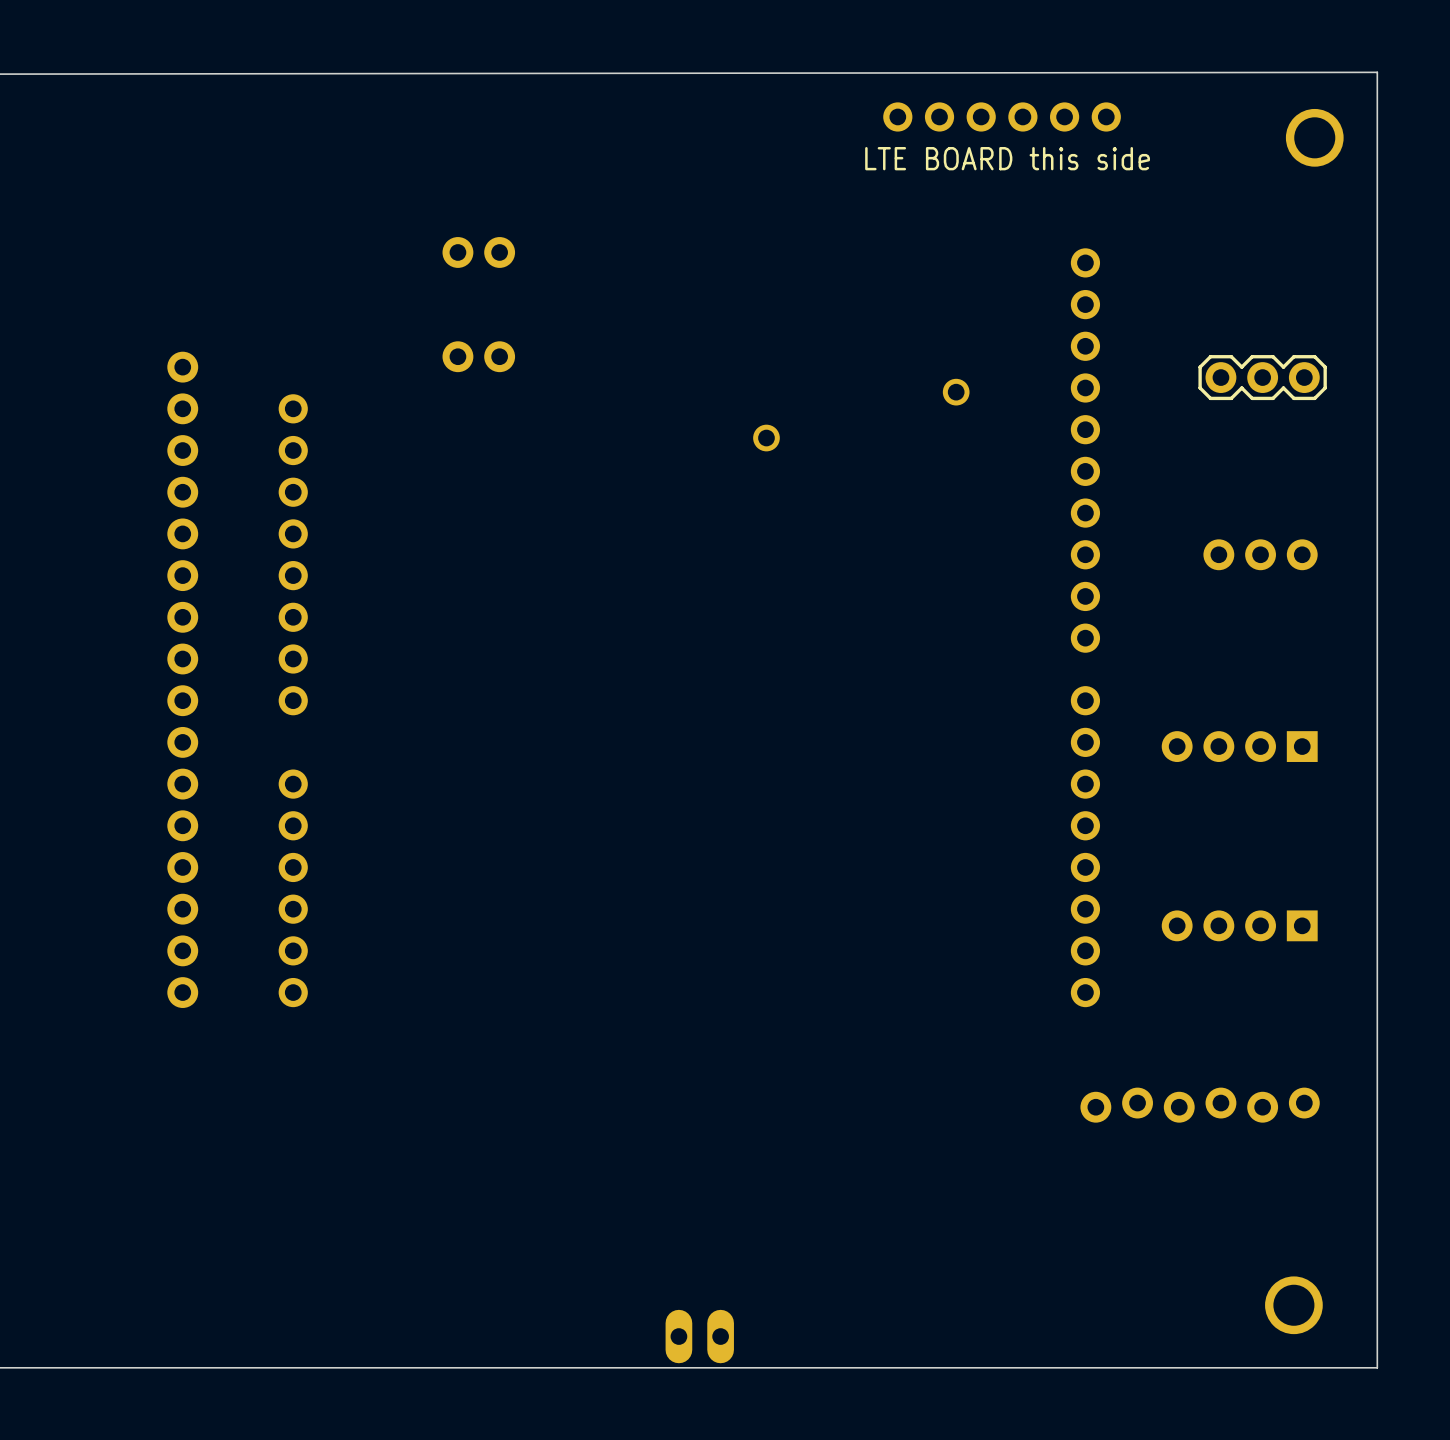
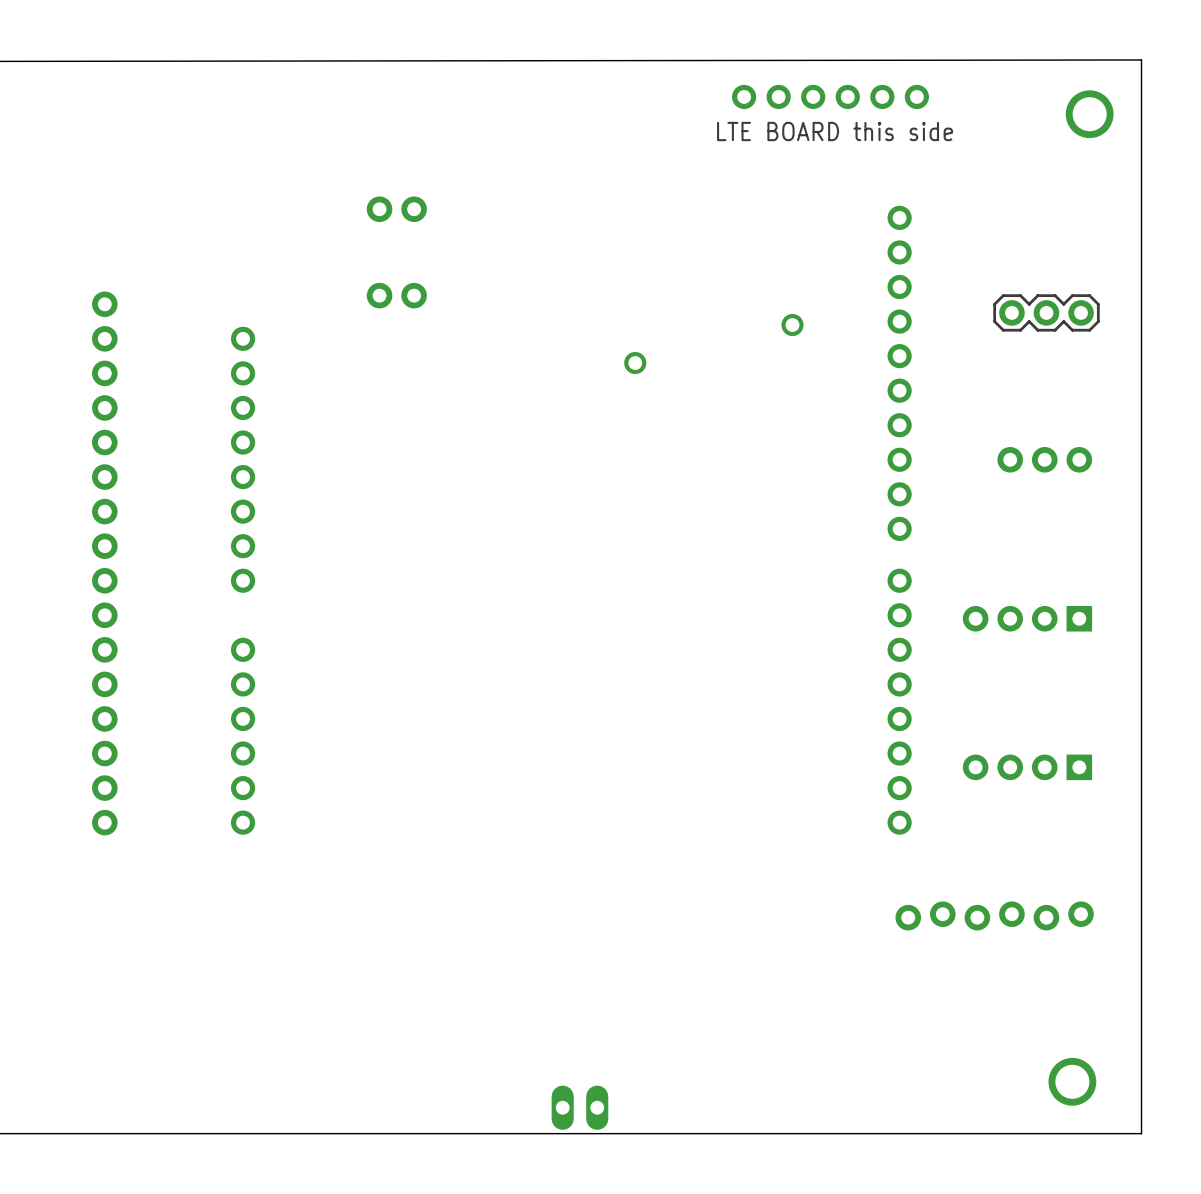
part position: (182, 679) -> (104, 563)

